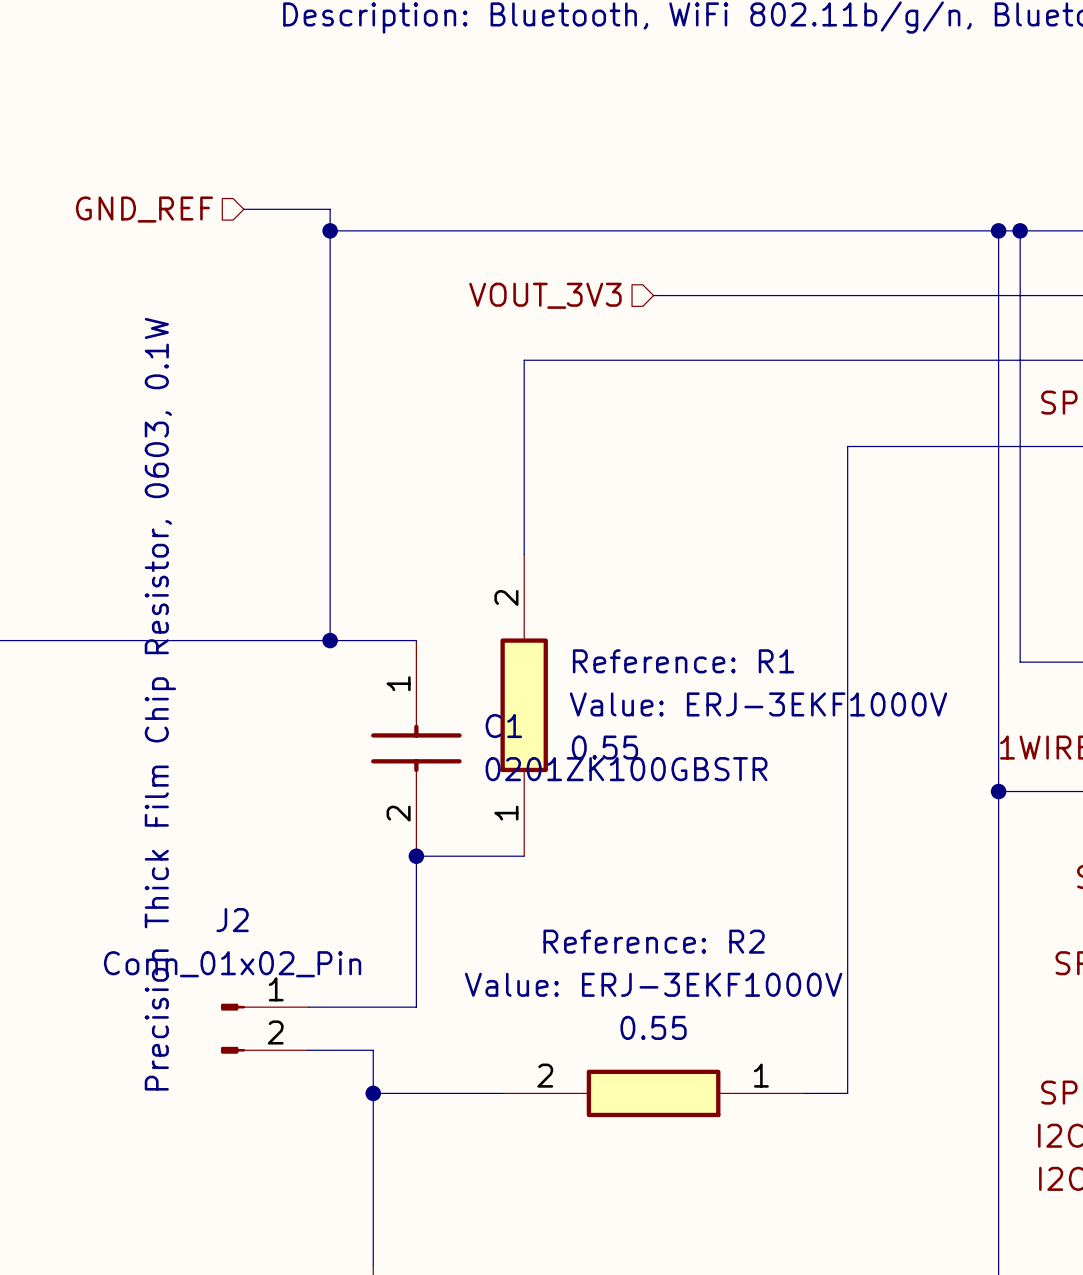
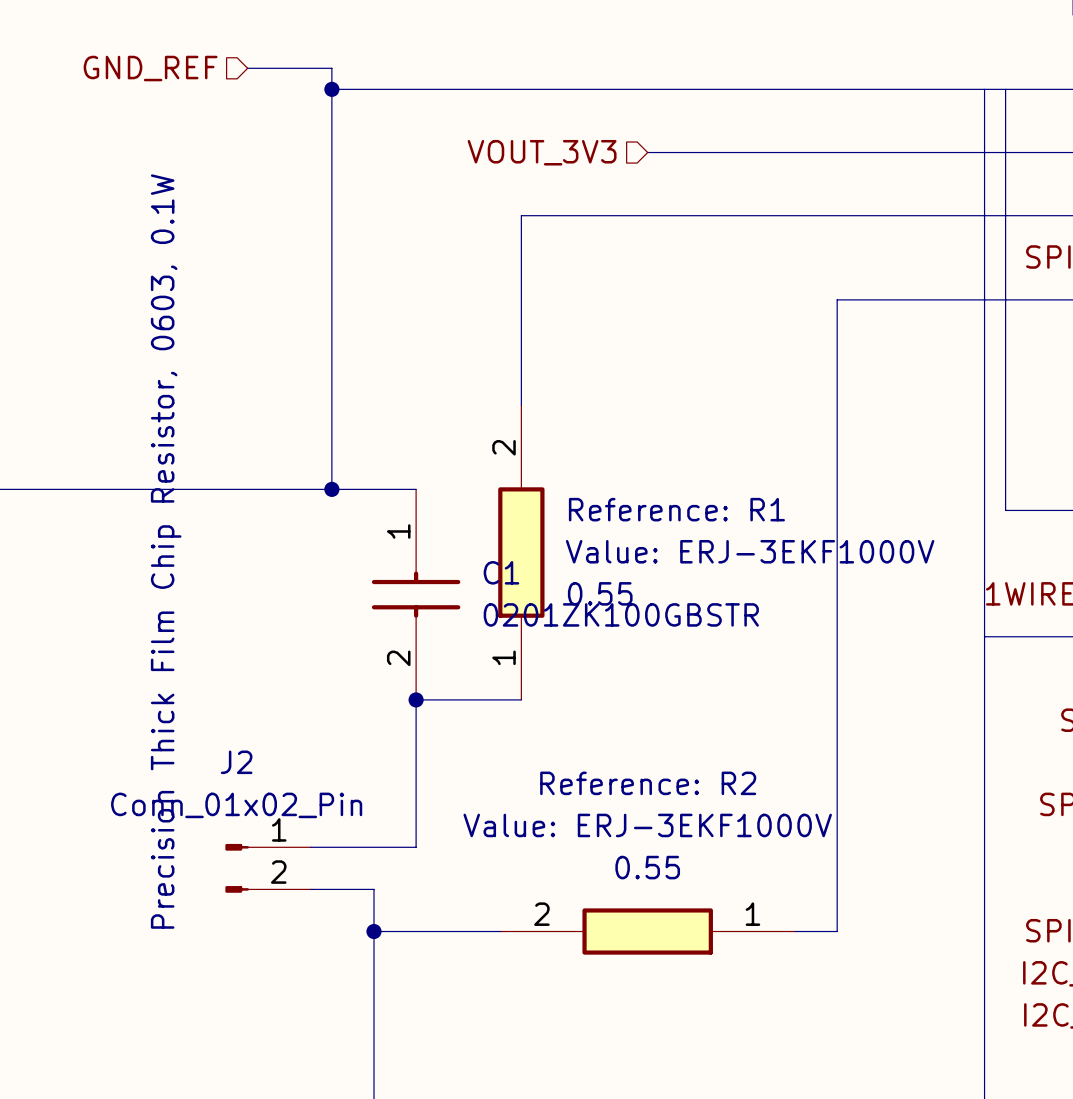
junction: (998, 230) -> none
junction: (1020, 230) -> none
junction: (998, 791) -> none

